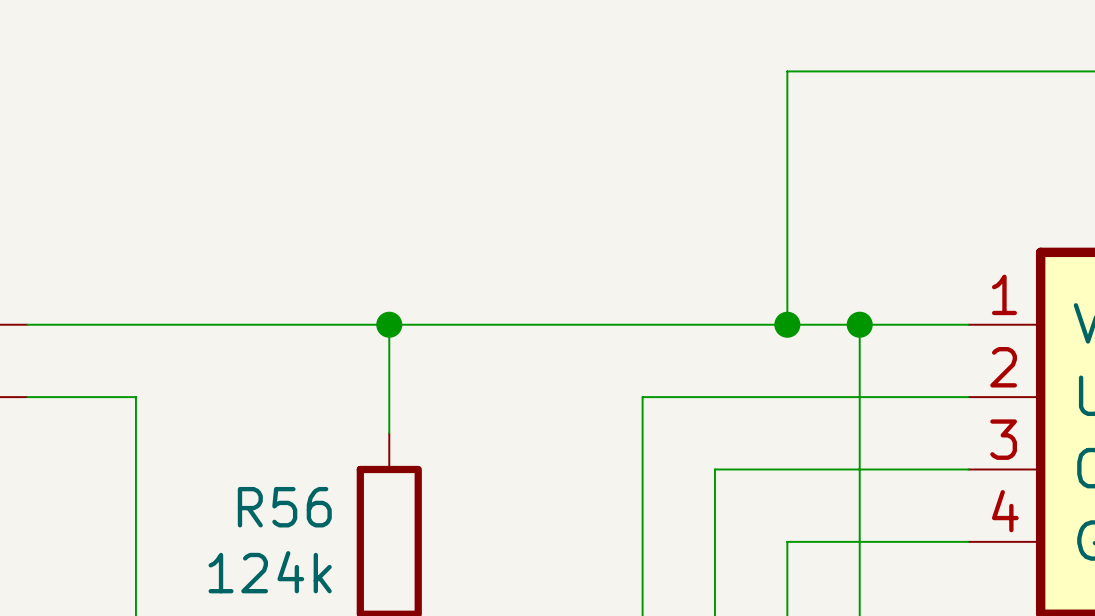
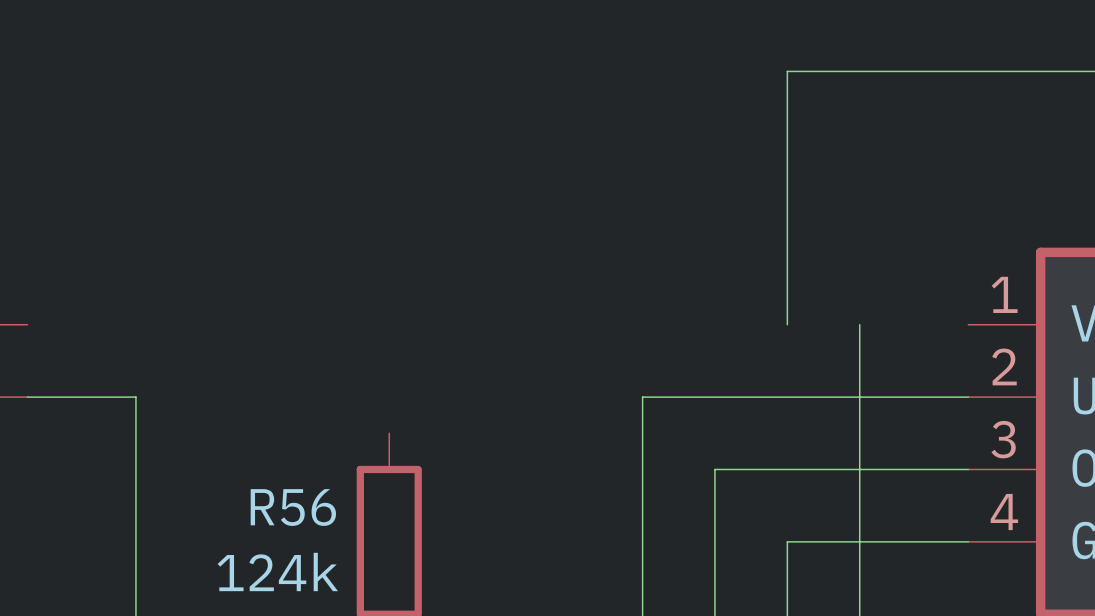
wire: (27, 324) (968, 324) -> none
wire: (389, 324) (389, 433) -> none
junction: (389, 324) -> none
junction: (787, 324) -> none
junction: (859, 324) -> none

